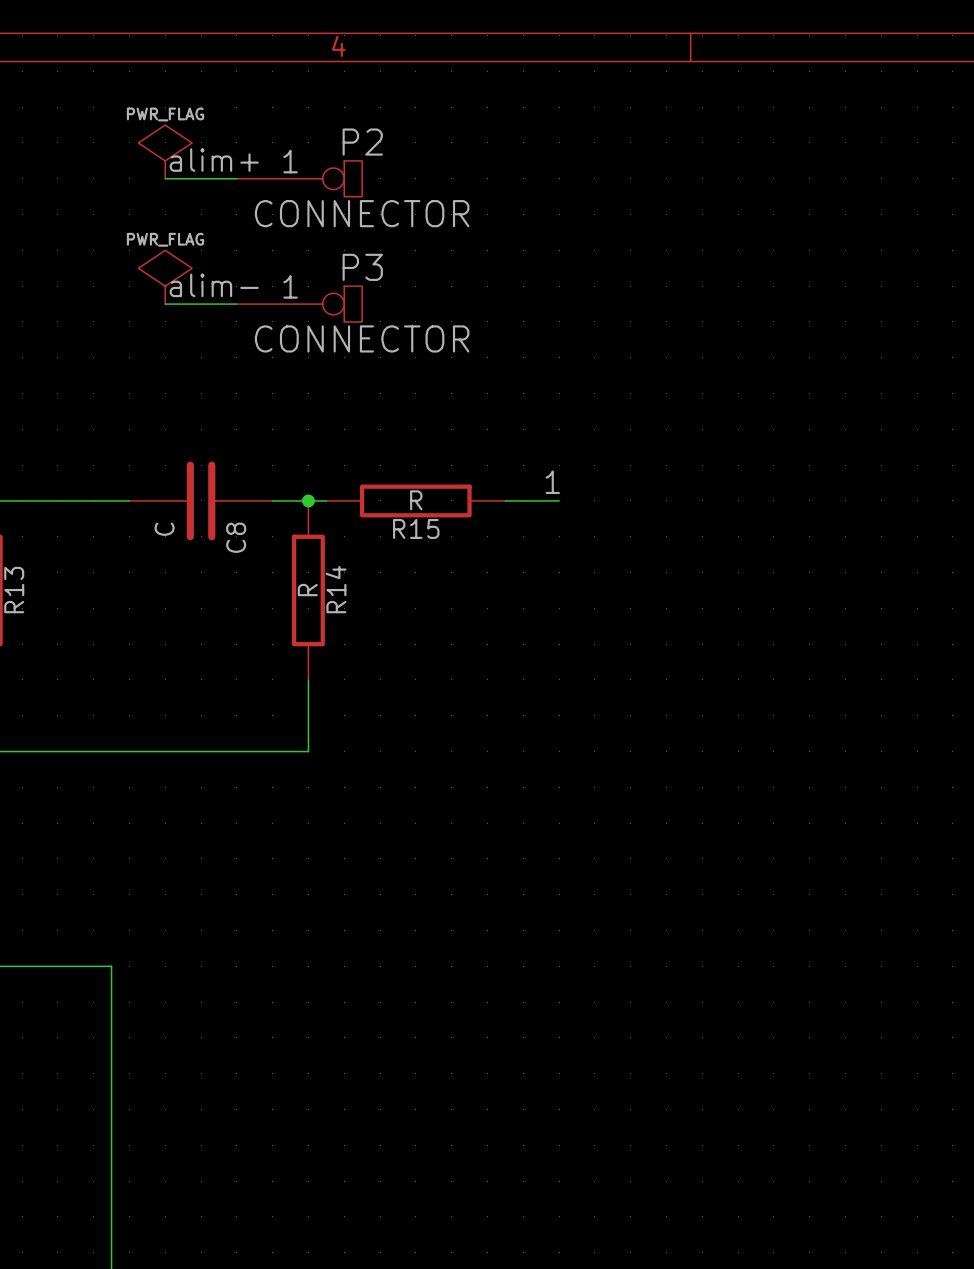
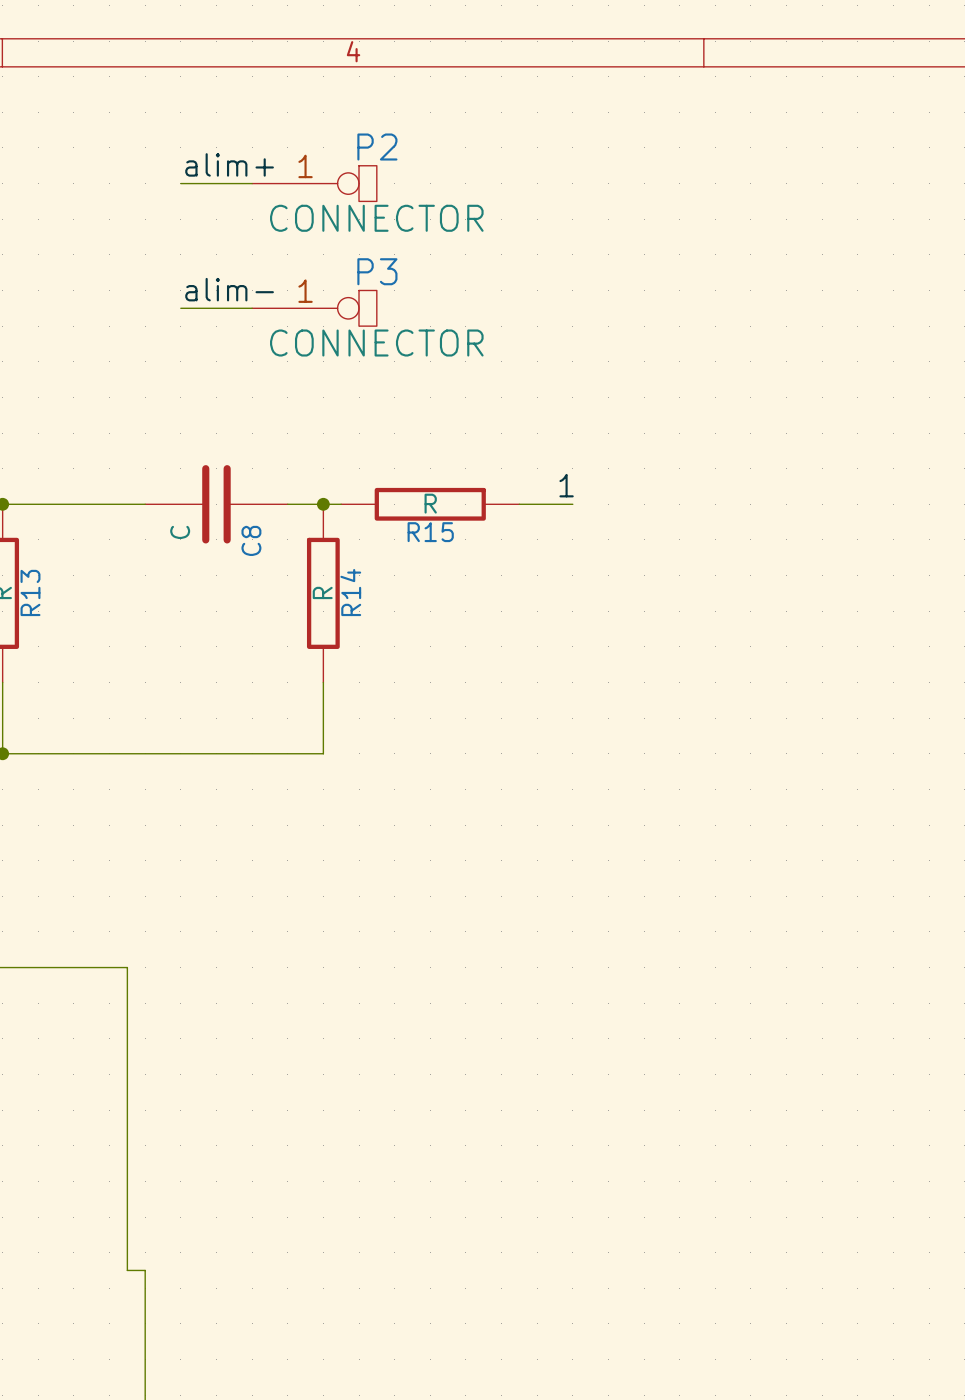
power symbol: PWR_FLAG (165, 151) -> none
power symbol: PWR_FLAG (165, 277) -> none

